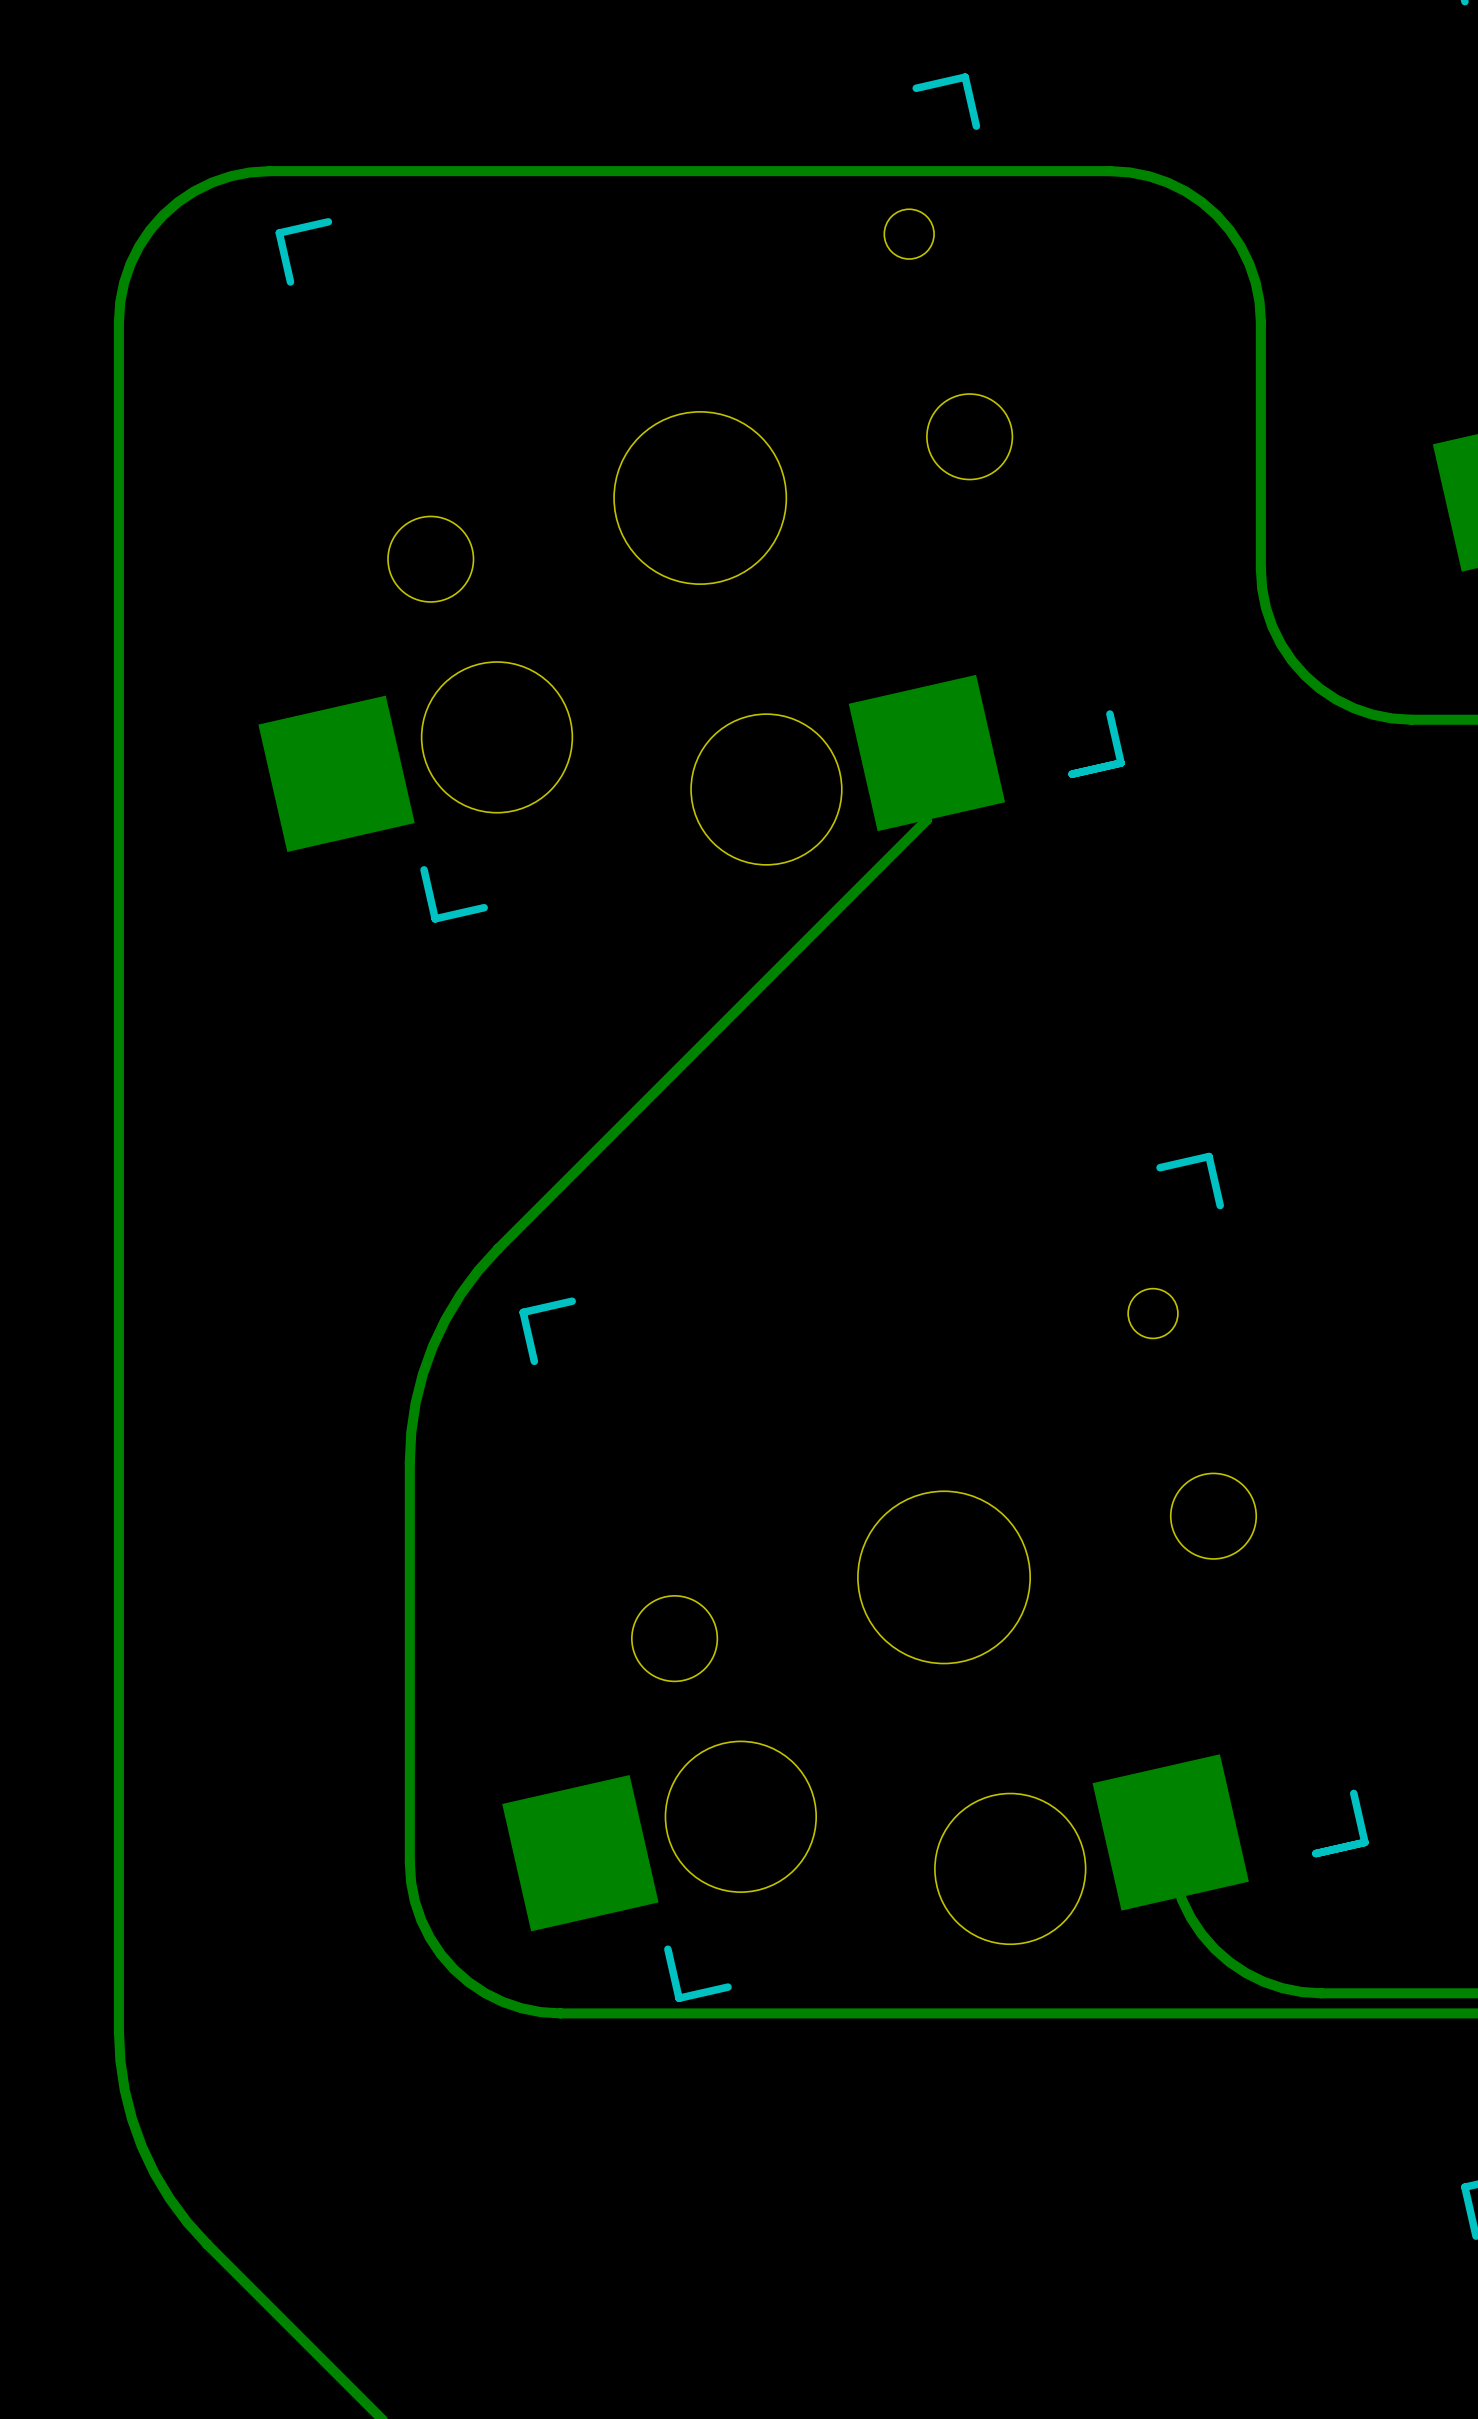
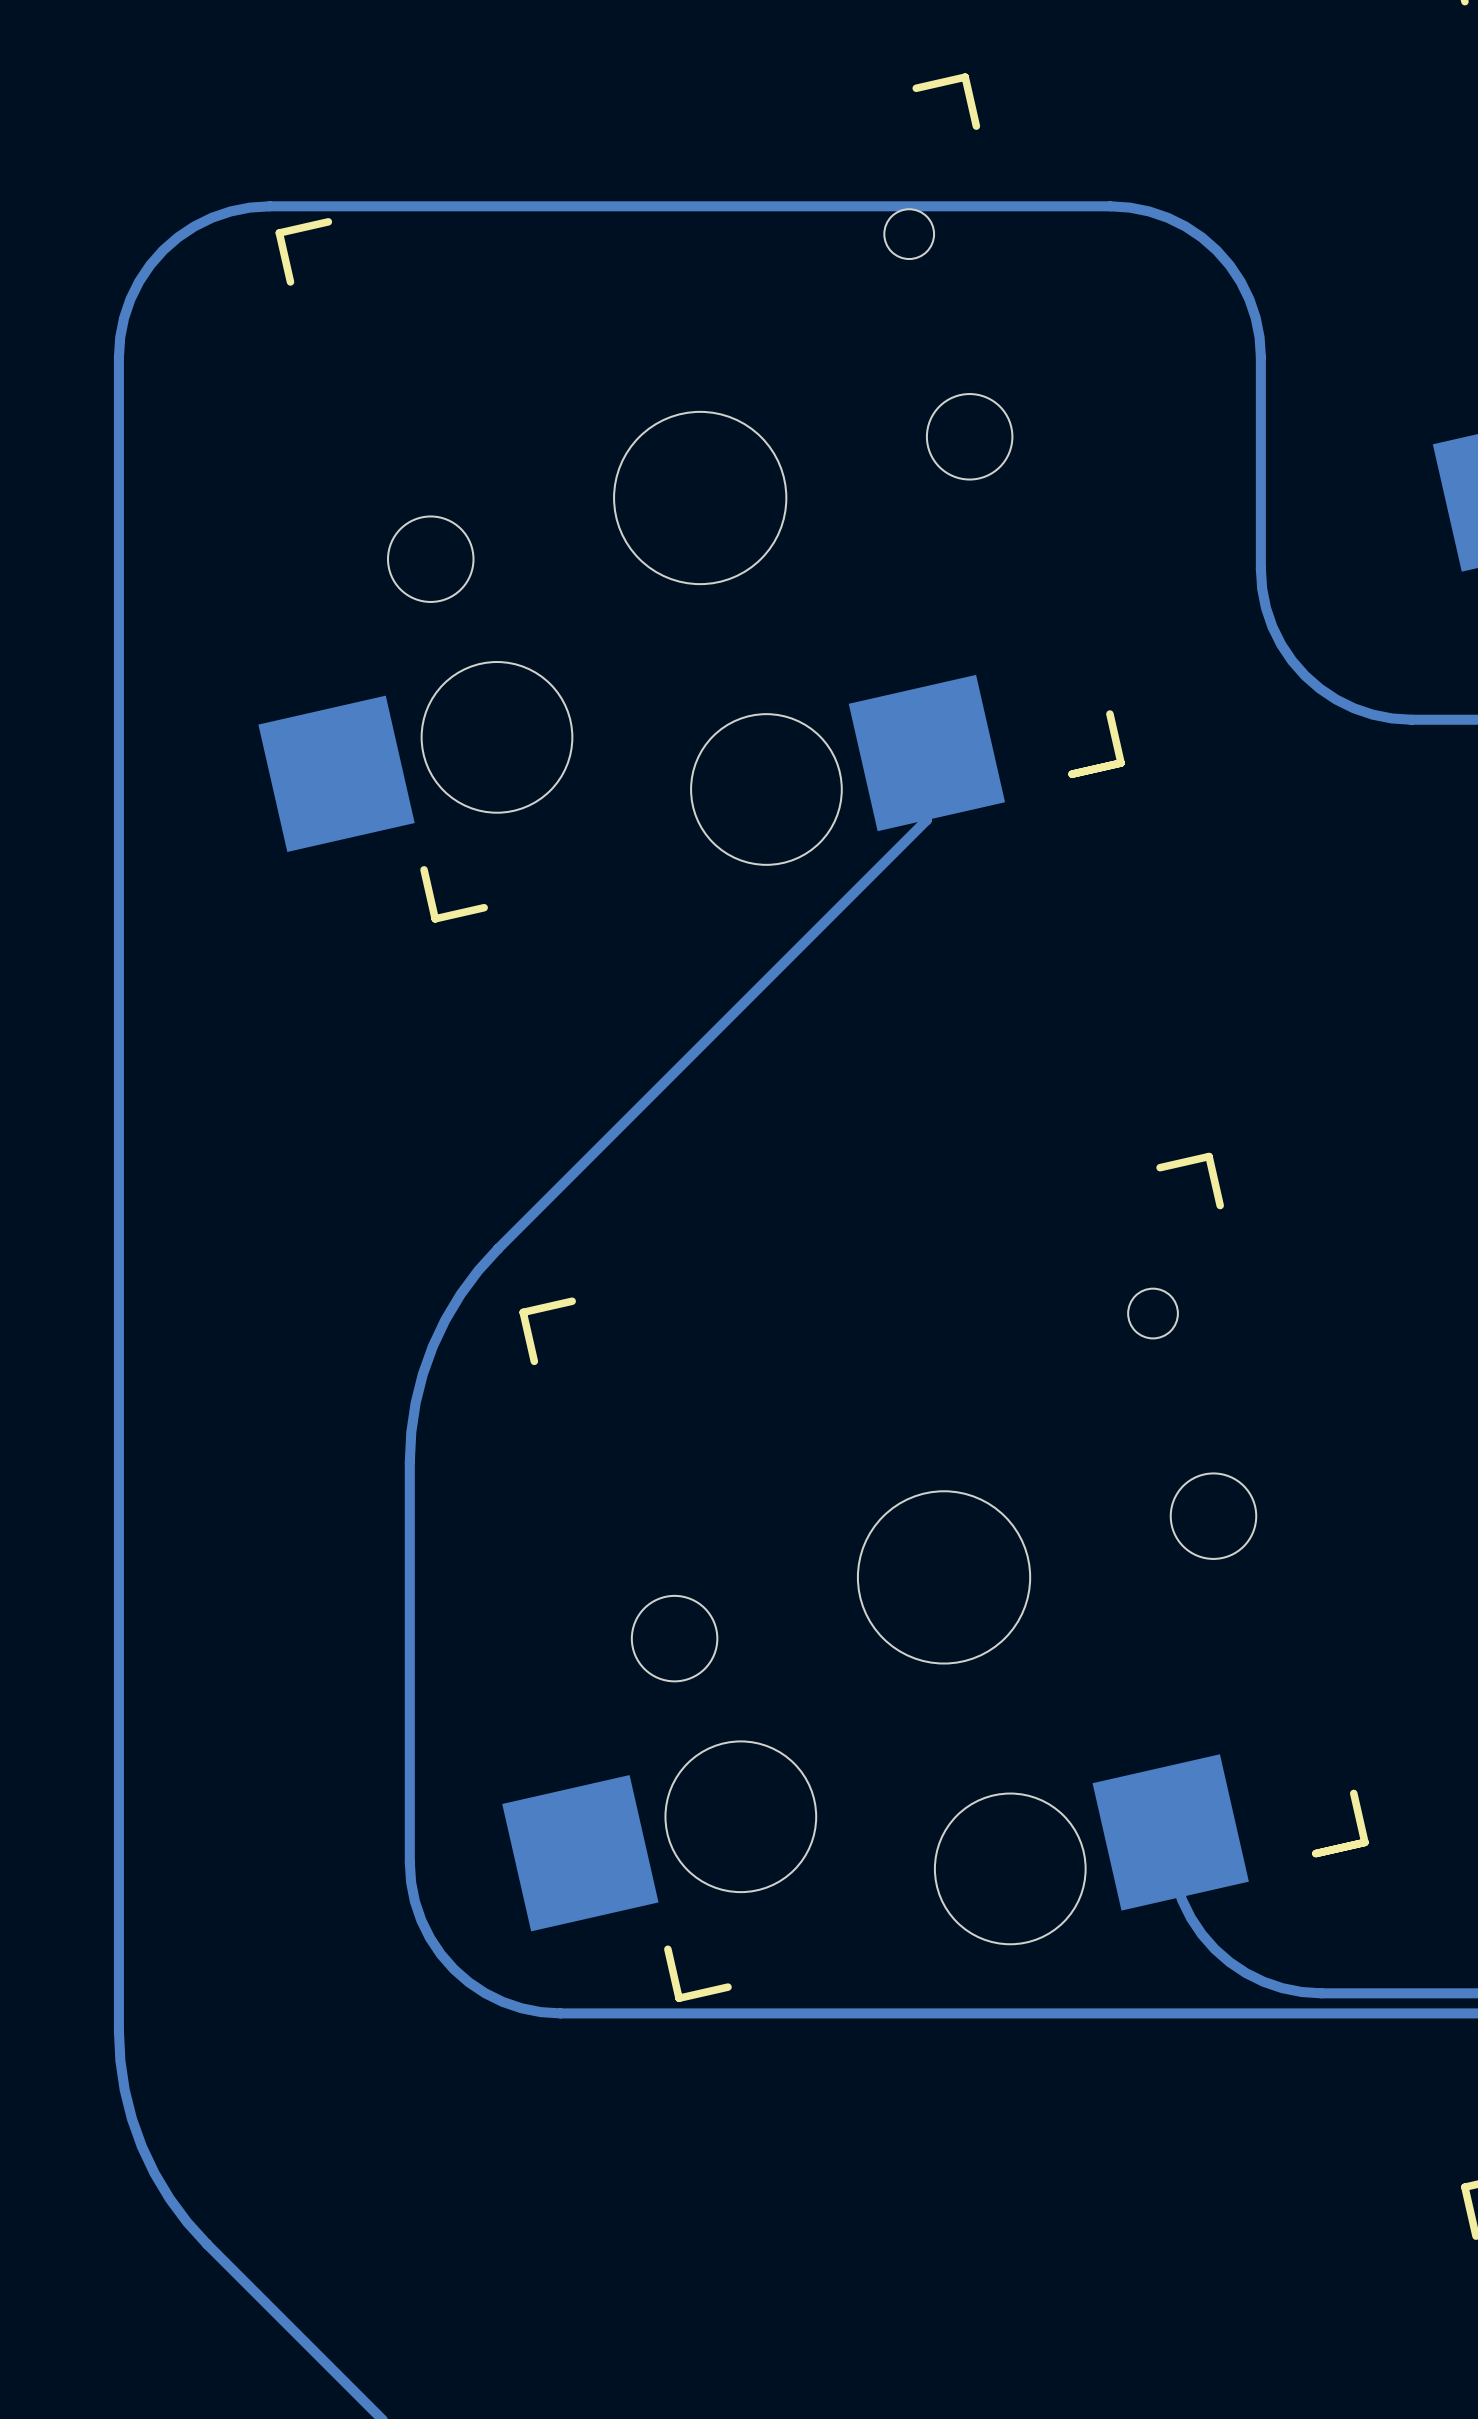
bottom track: (118, 357) (120, 302) (124, 282) (139, 246) (150, 230) (163, 215) (194, 191) (230, 176) (269, 171) (1129, 172) (1149, 176) (1185, 191) (1216, 215) (1229, 230) (1240, 246) (1255, 282) (1259, 302) (1260, 357) -> (118, 357) (124, 318) (130, 299) (139, 281) (163, 250) (194, 226) (211, 217) (249, 207) (269, 206) (1129, 207) (1167, 217) (1201, 237) (1216, 250) (1229, 265) (1249, 299) (1259, 337) (1260, 357)

